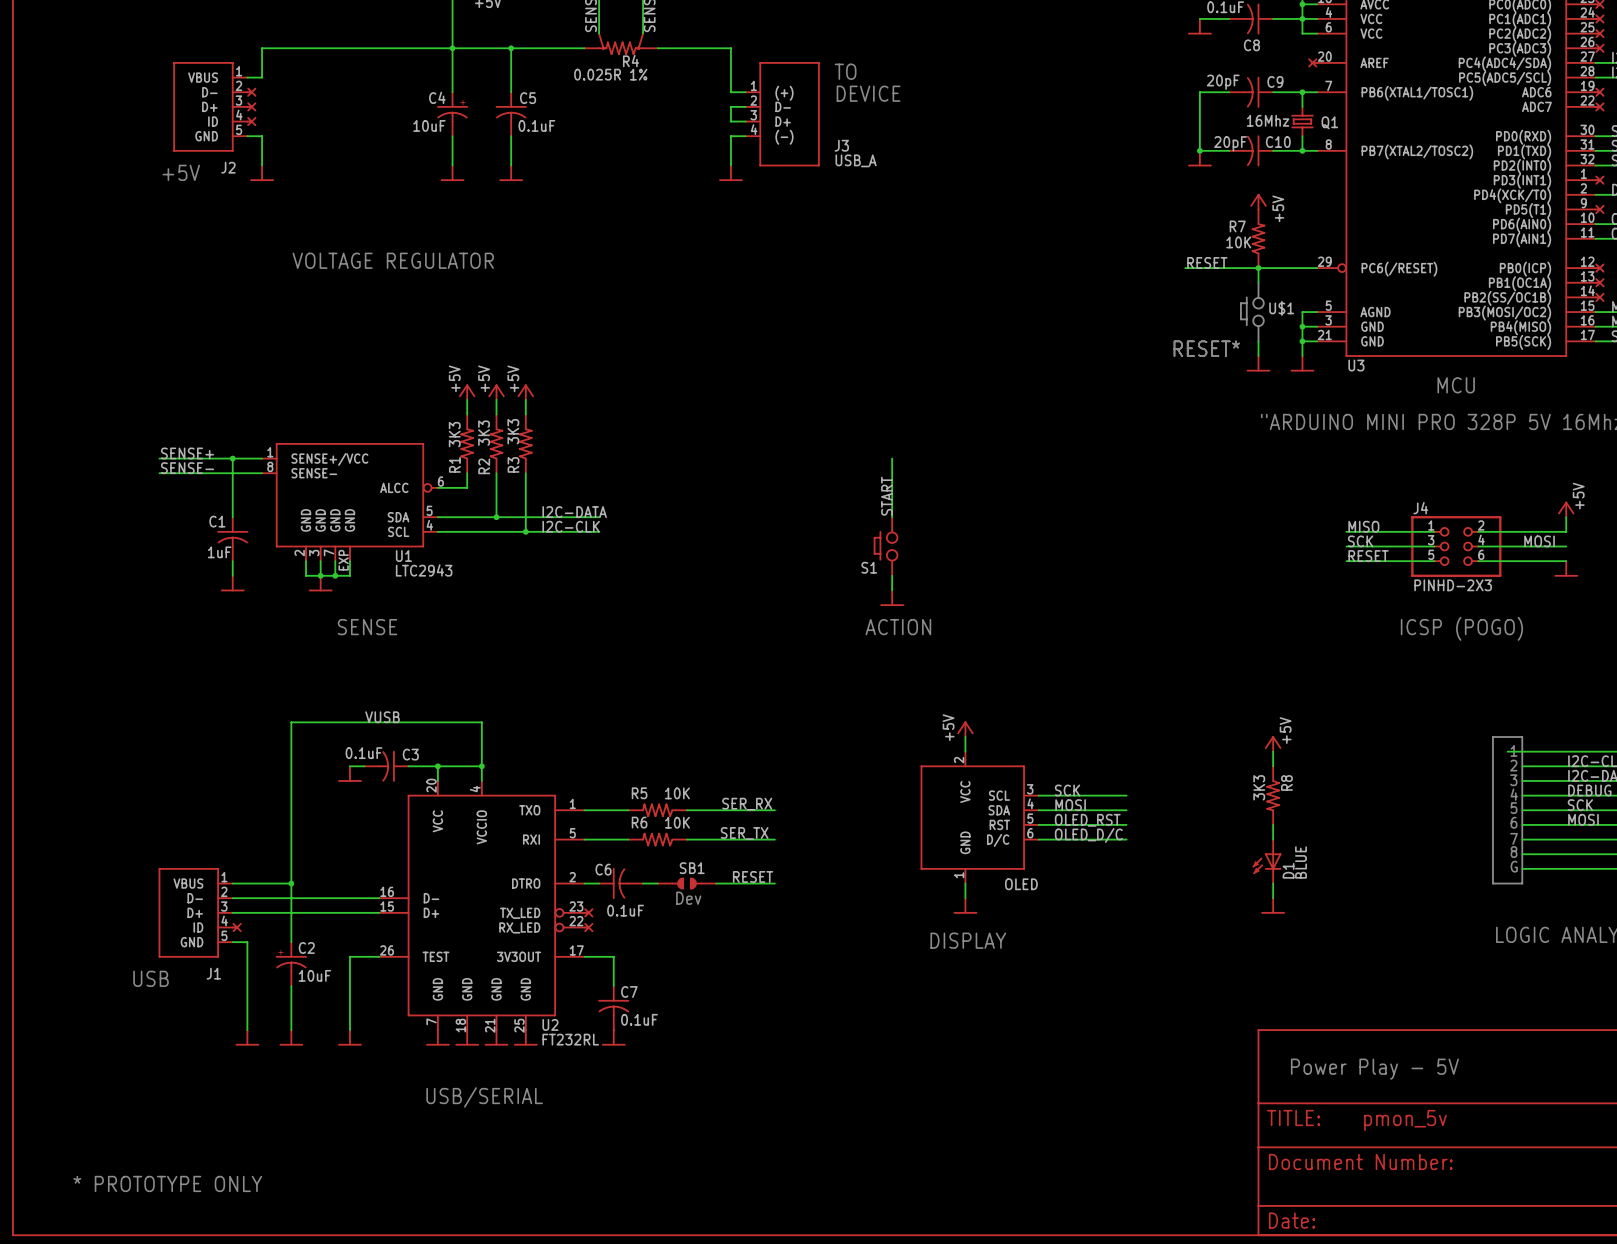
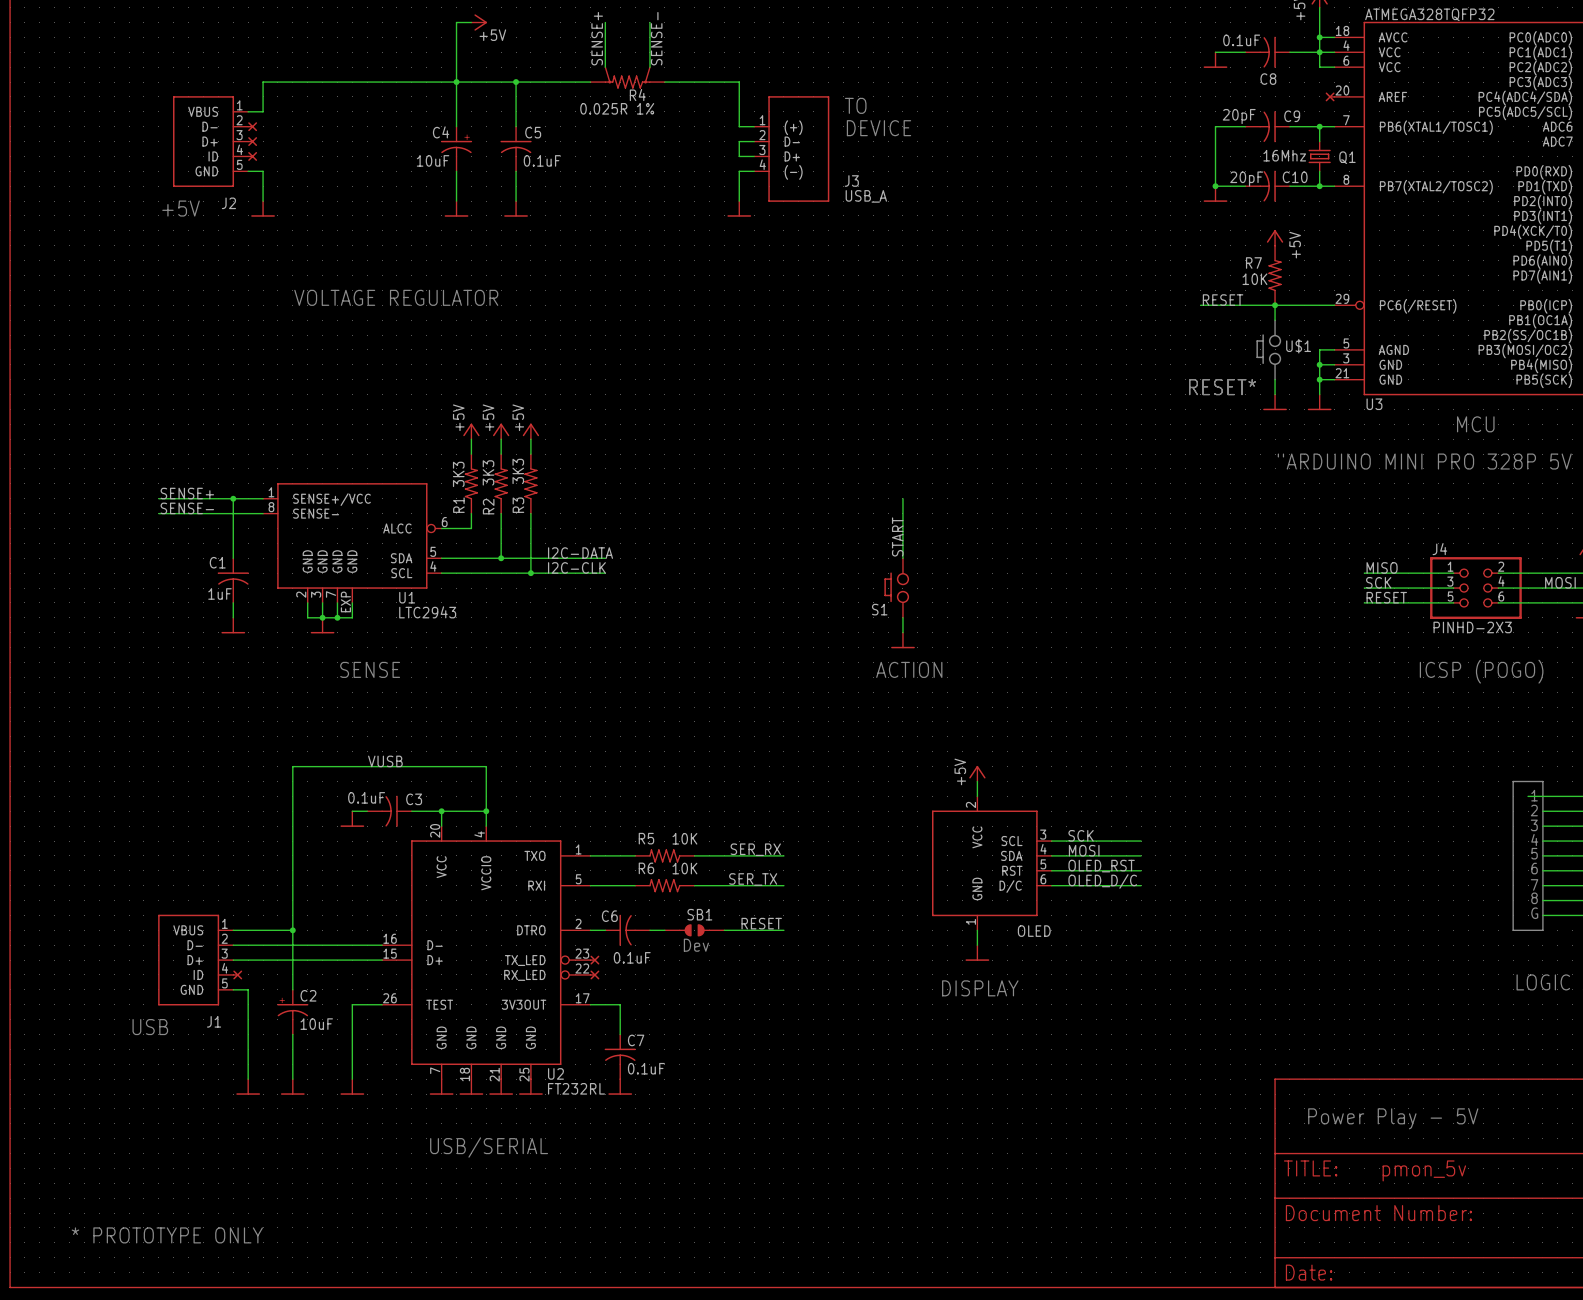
power symbol: +5V (1273, 743) -> none
wire: (1273, 751) (1273, 766) -> none
R8: 3K3 (1273, 795) -> none
wire: (1273, 824) (1273, 839) -> none
D1: BLUE (1267, 861) -> none
wire: (1273, 883) (1273, 898) -> none
power symbol: (1273, 905) -> none

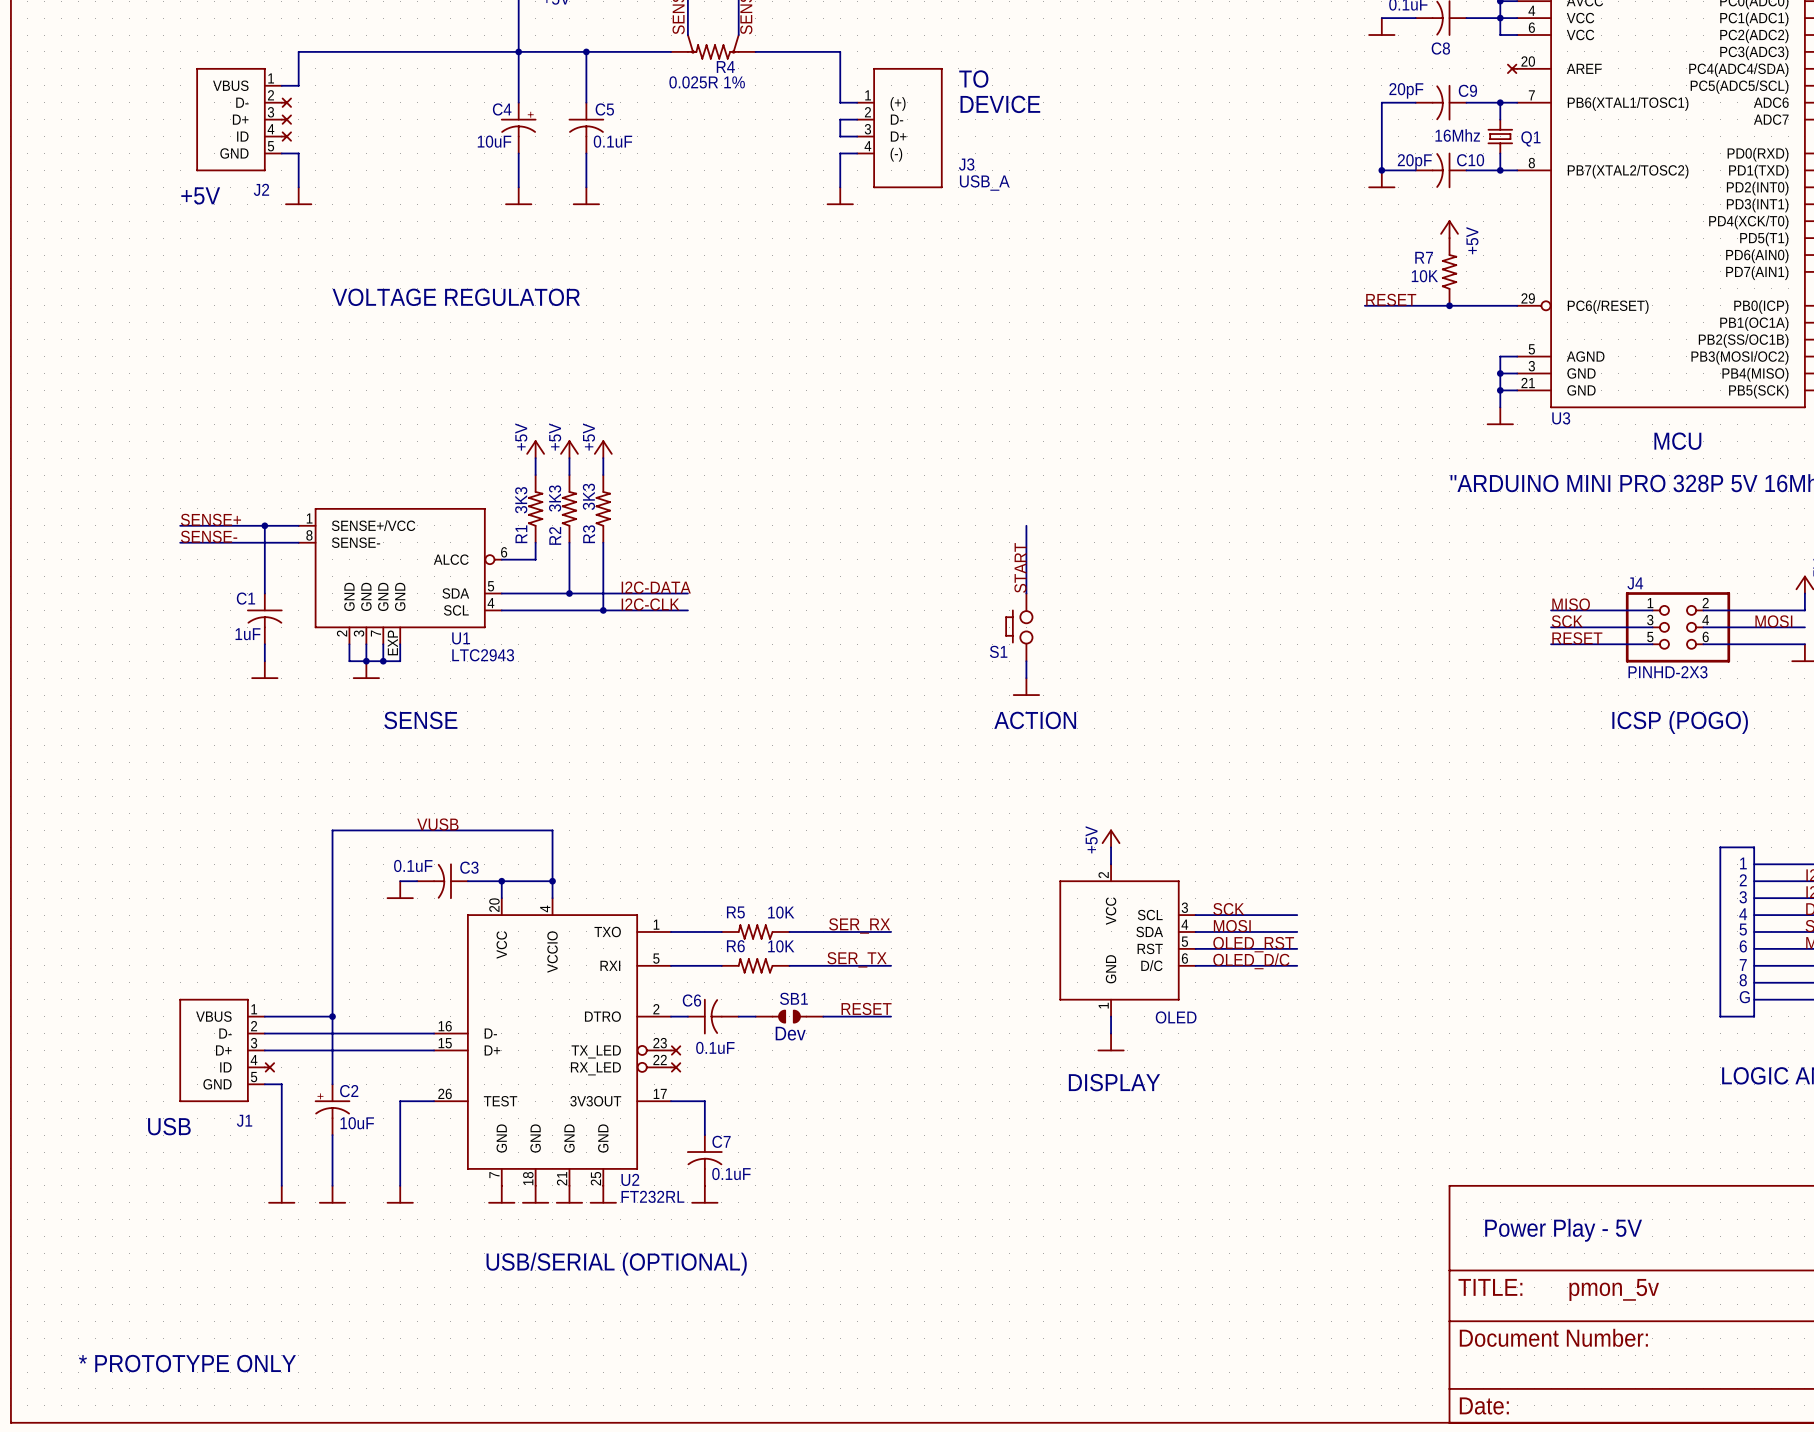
wire: (1275, 305) (1275, 320) -> none
U$1: (1268, 349) -> none
wire: (1275, 379) (1275, 394) -> none
text: RESET* (1222, 387) -> none
power symbol: (1275, 402) -> none
wire: (1528, 796) (1542, 796) -> none
text: USB/SERIAL (489, 1147) -> USB/SERIAL (OPTIONAL) (616, 1264)

